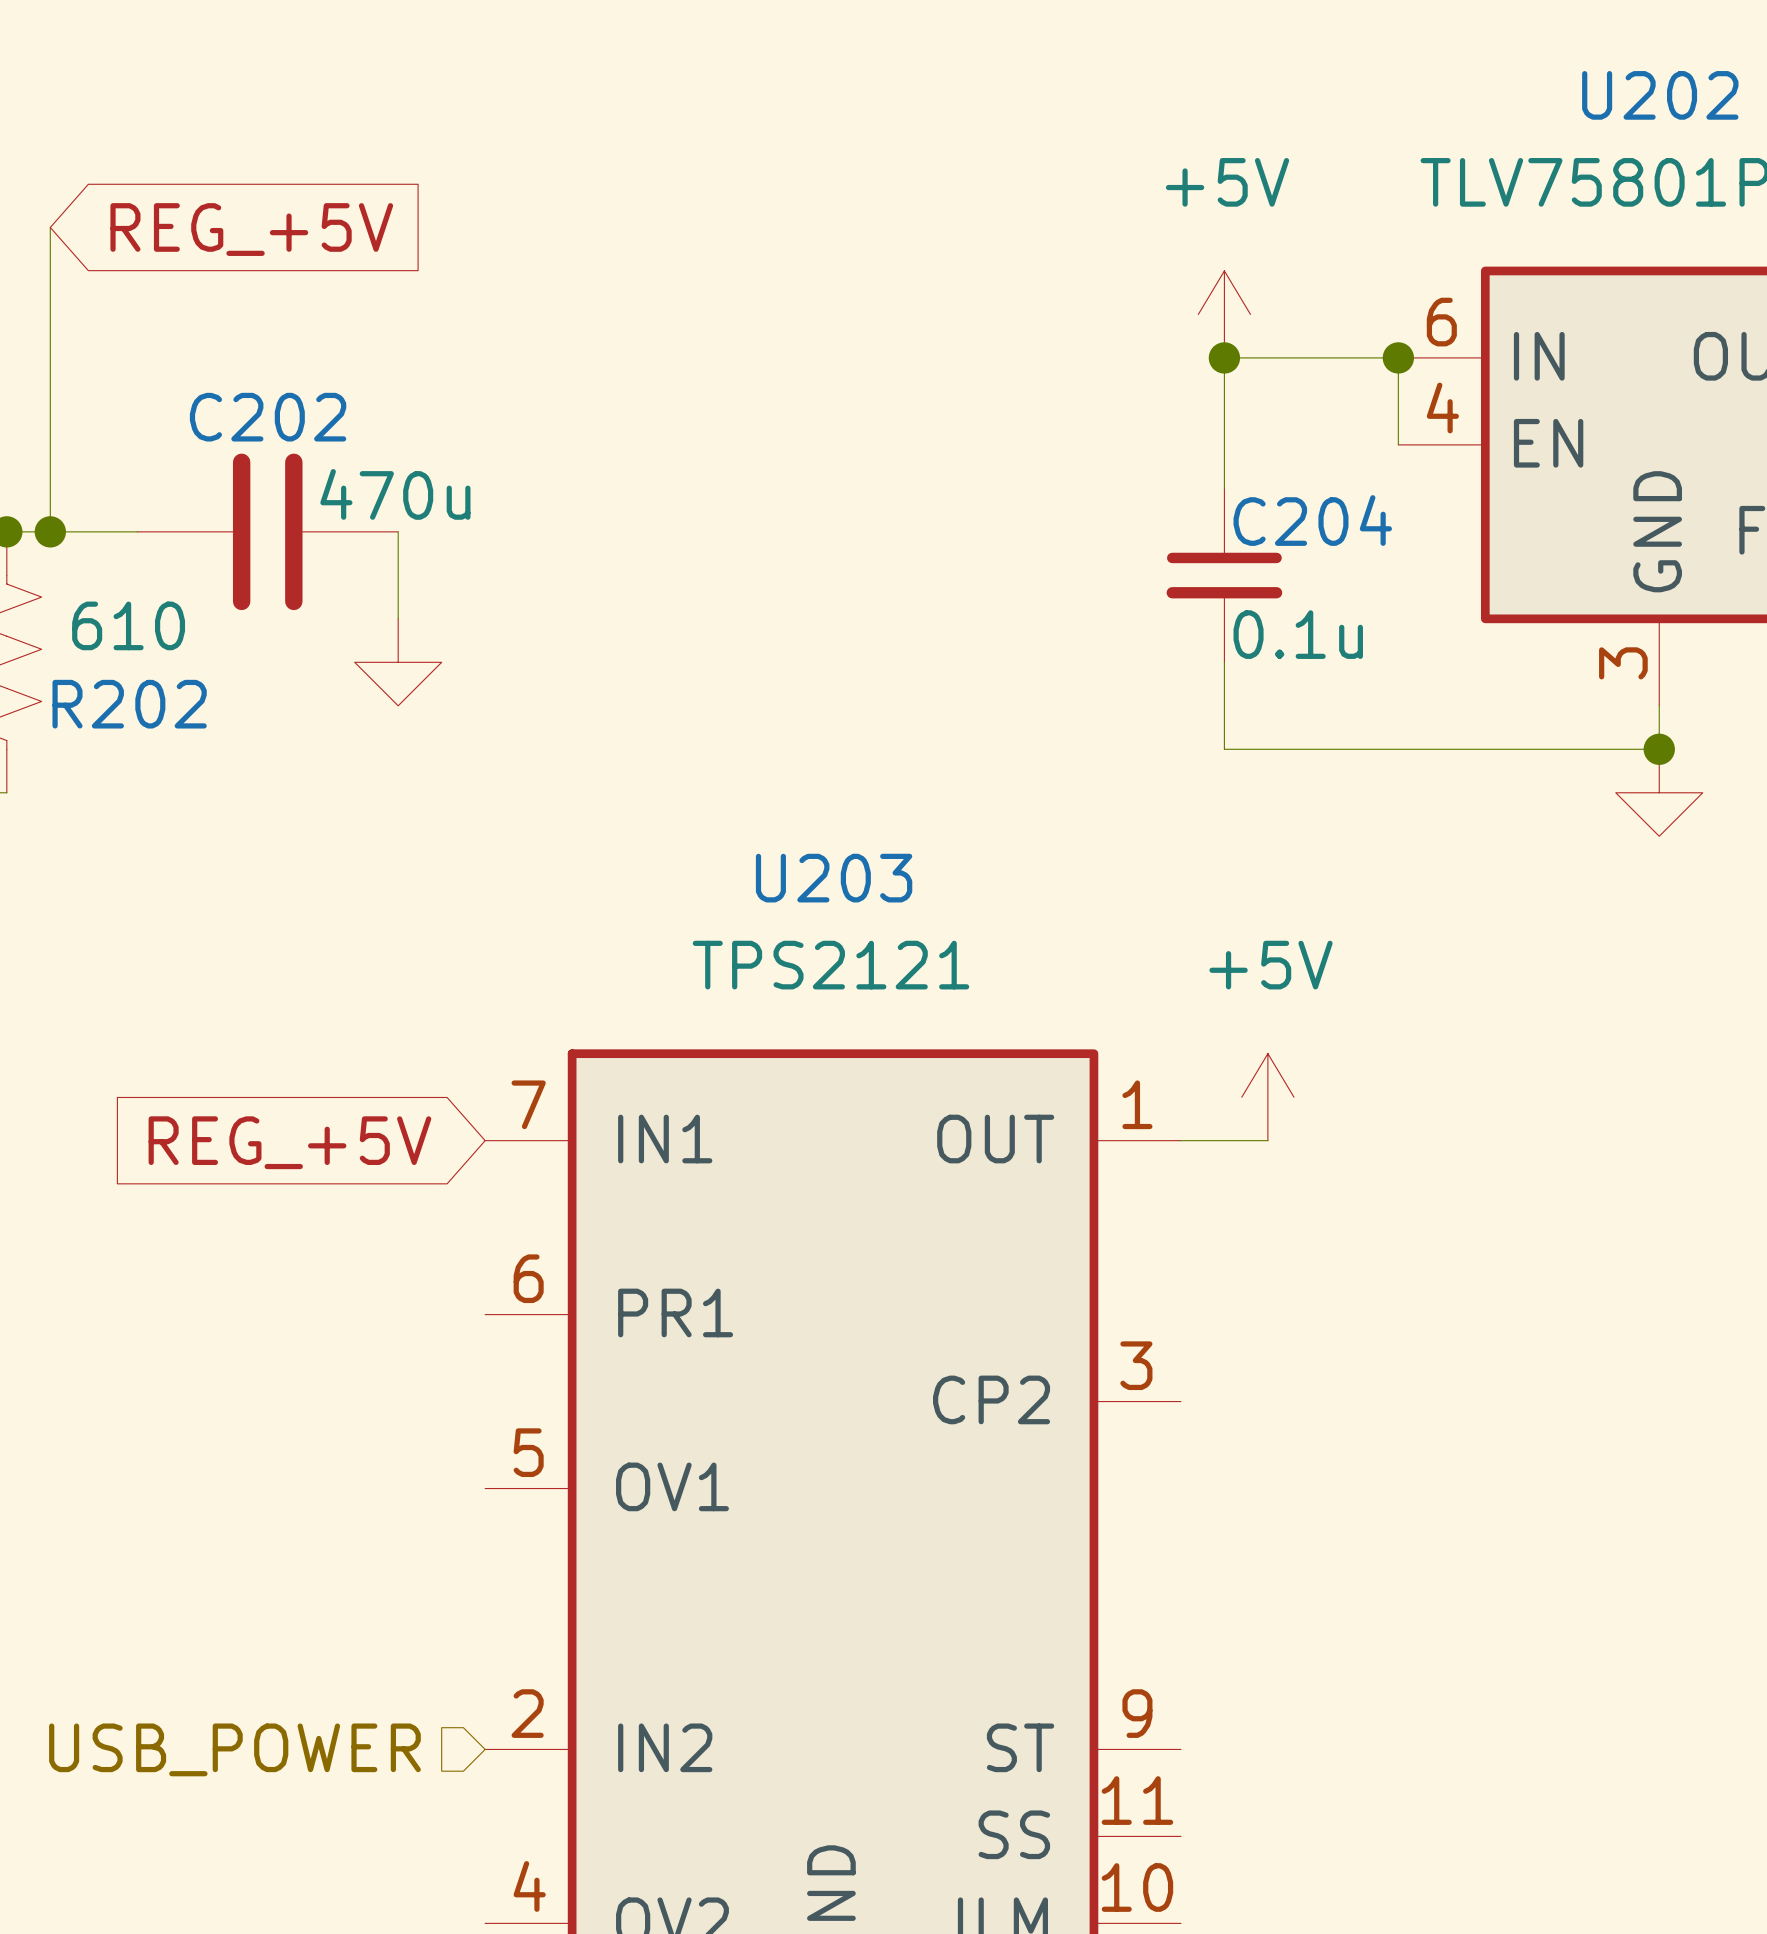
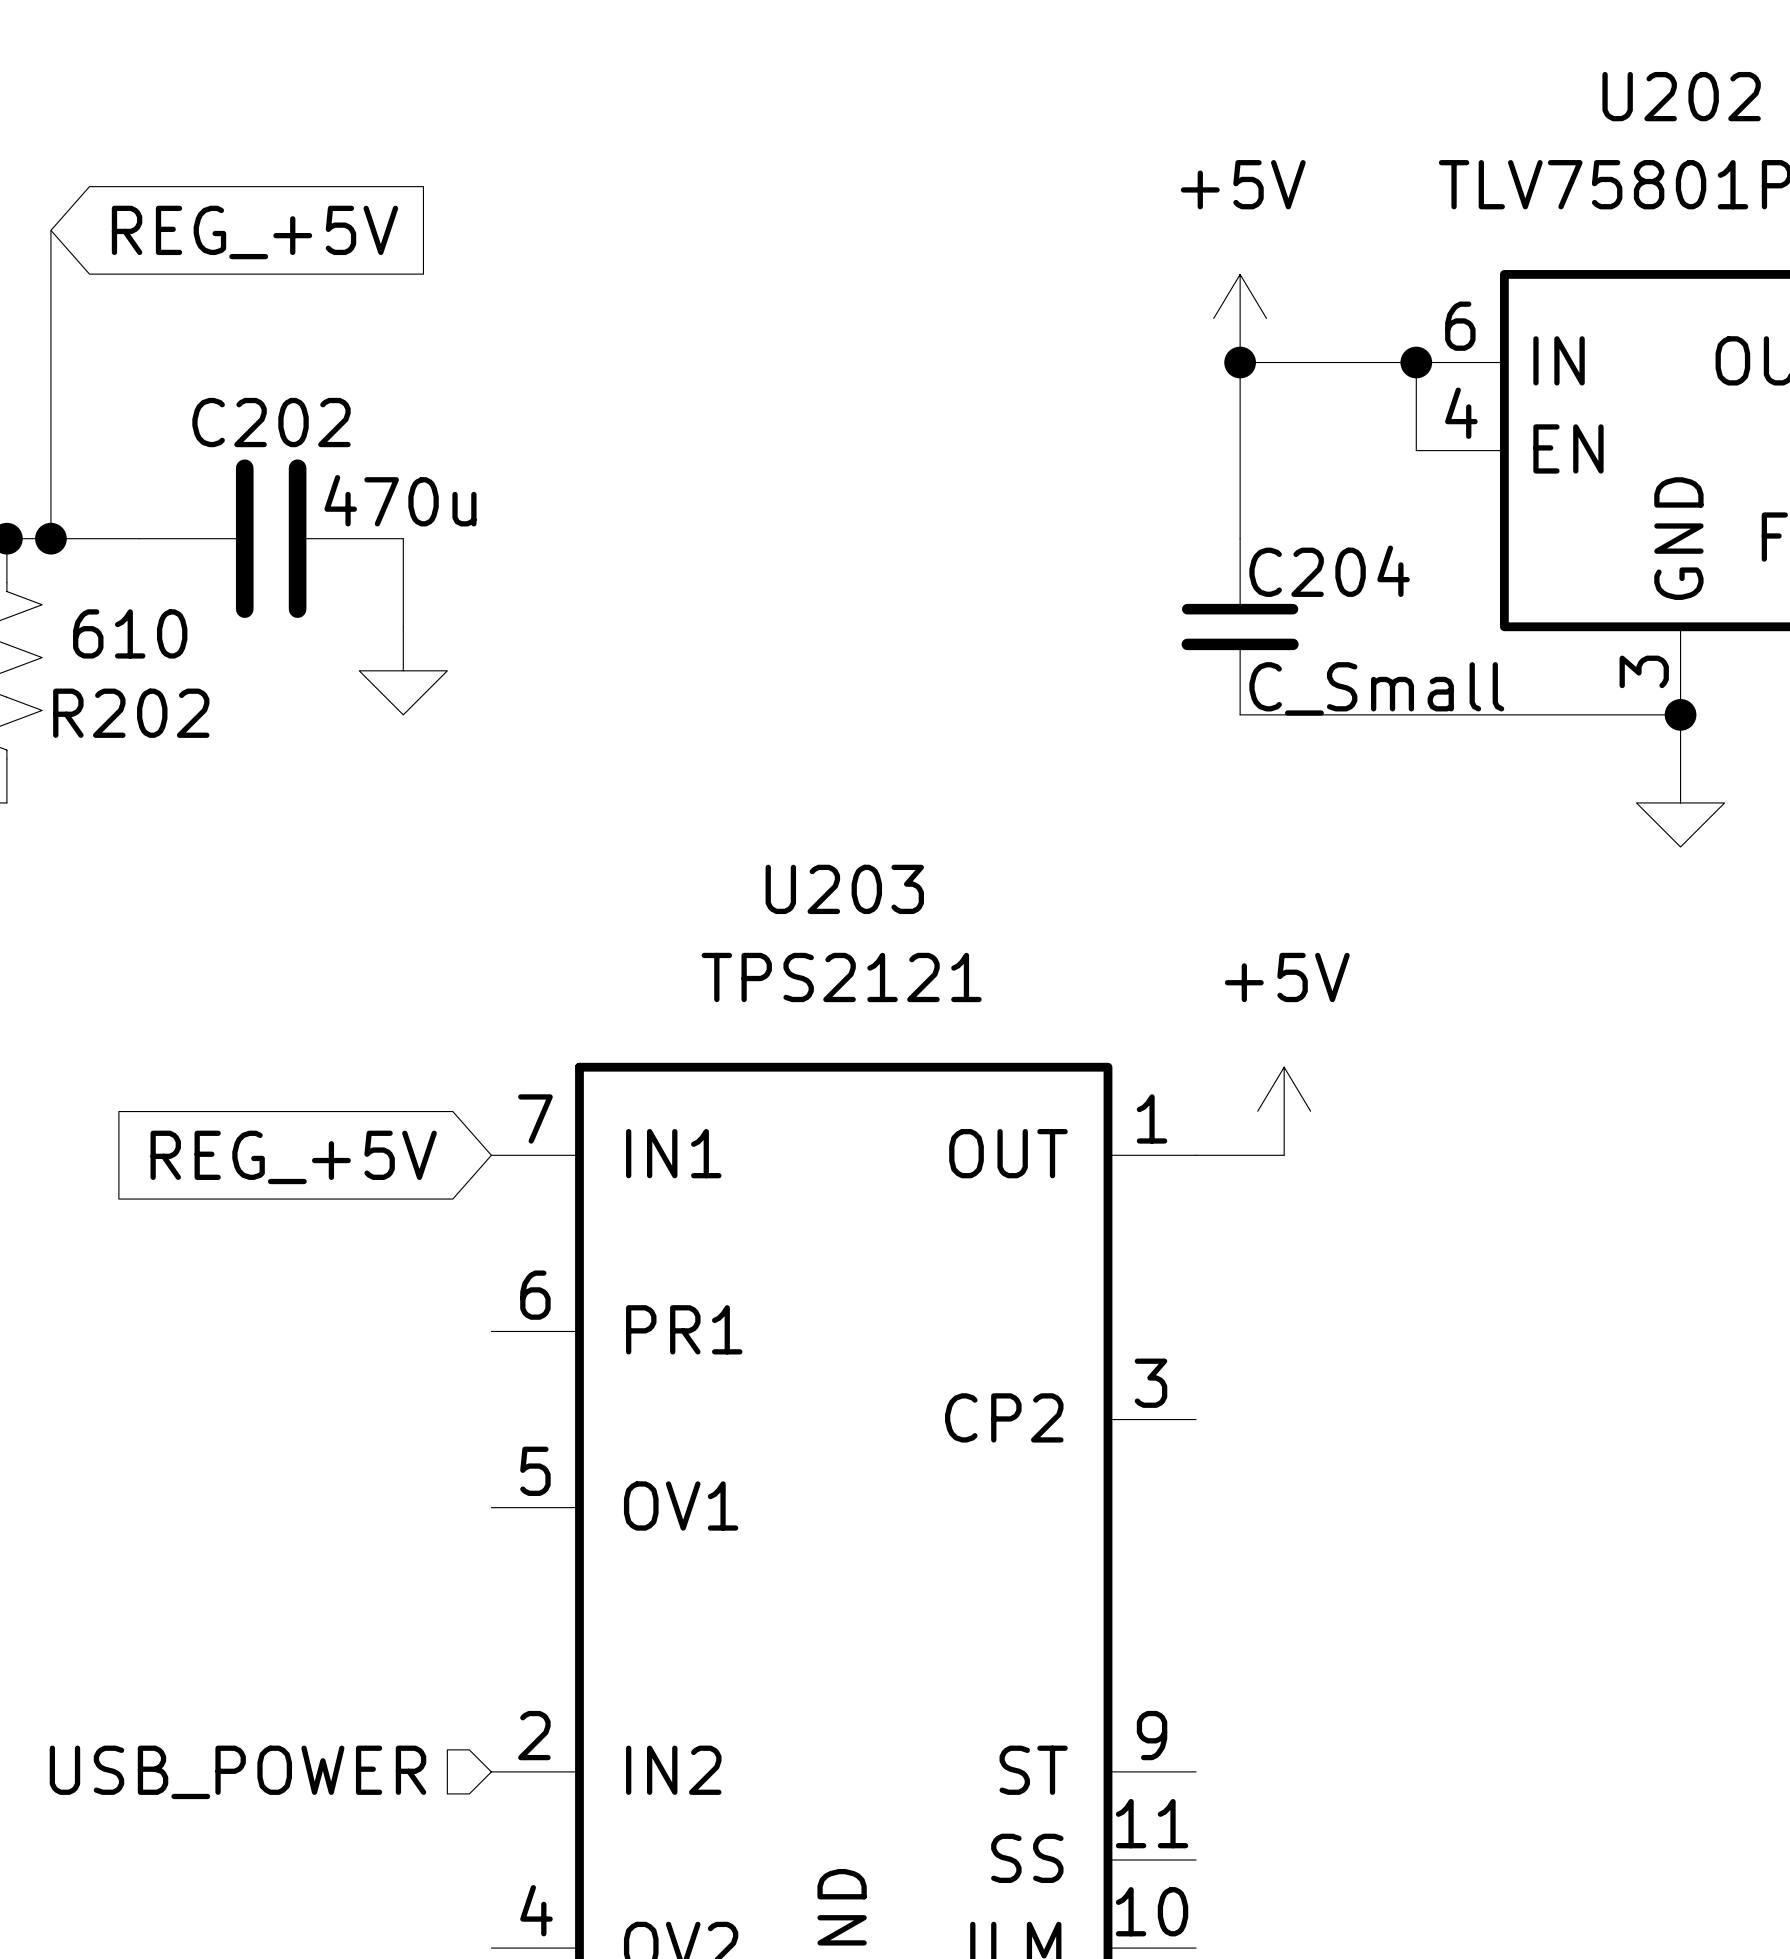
C204 position: (1224, 575) -> (1240, 626)
C204 value: 0.1u (1298, 634) -> C_Small (1376, 688)
wire: (1224, 662) (1224, 749) (1659, 749) -> none
wire: none -> (1240, 714) (1680, 714)
junction position: (1659, 749) -> (1680, 714)

